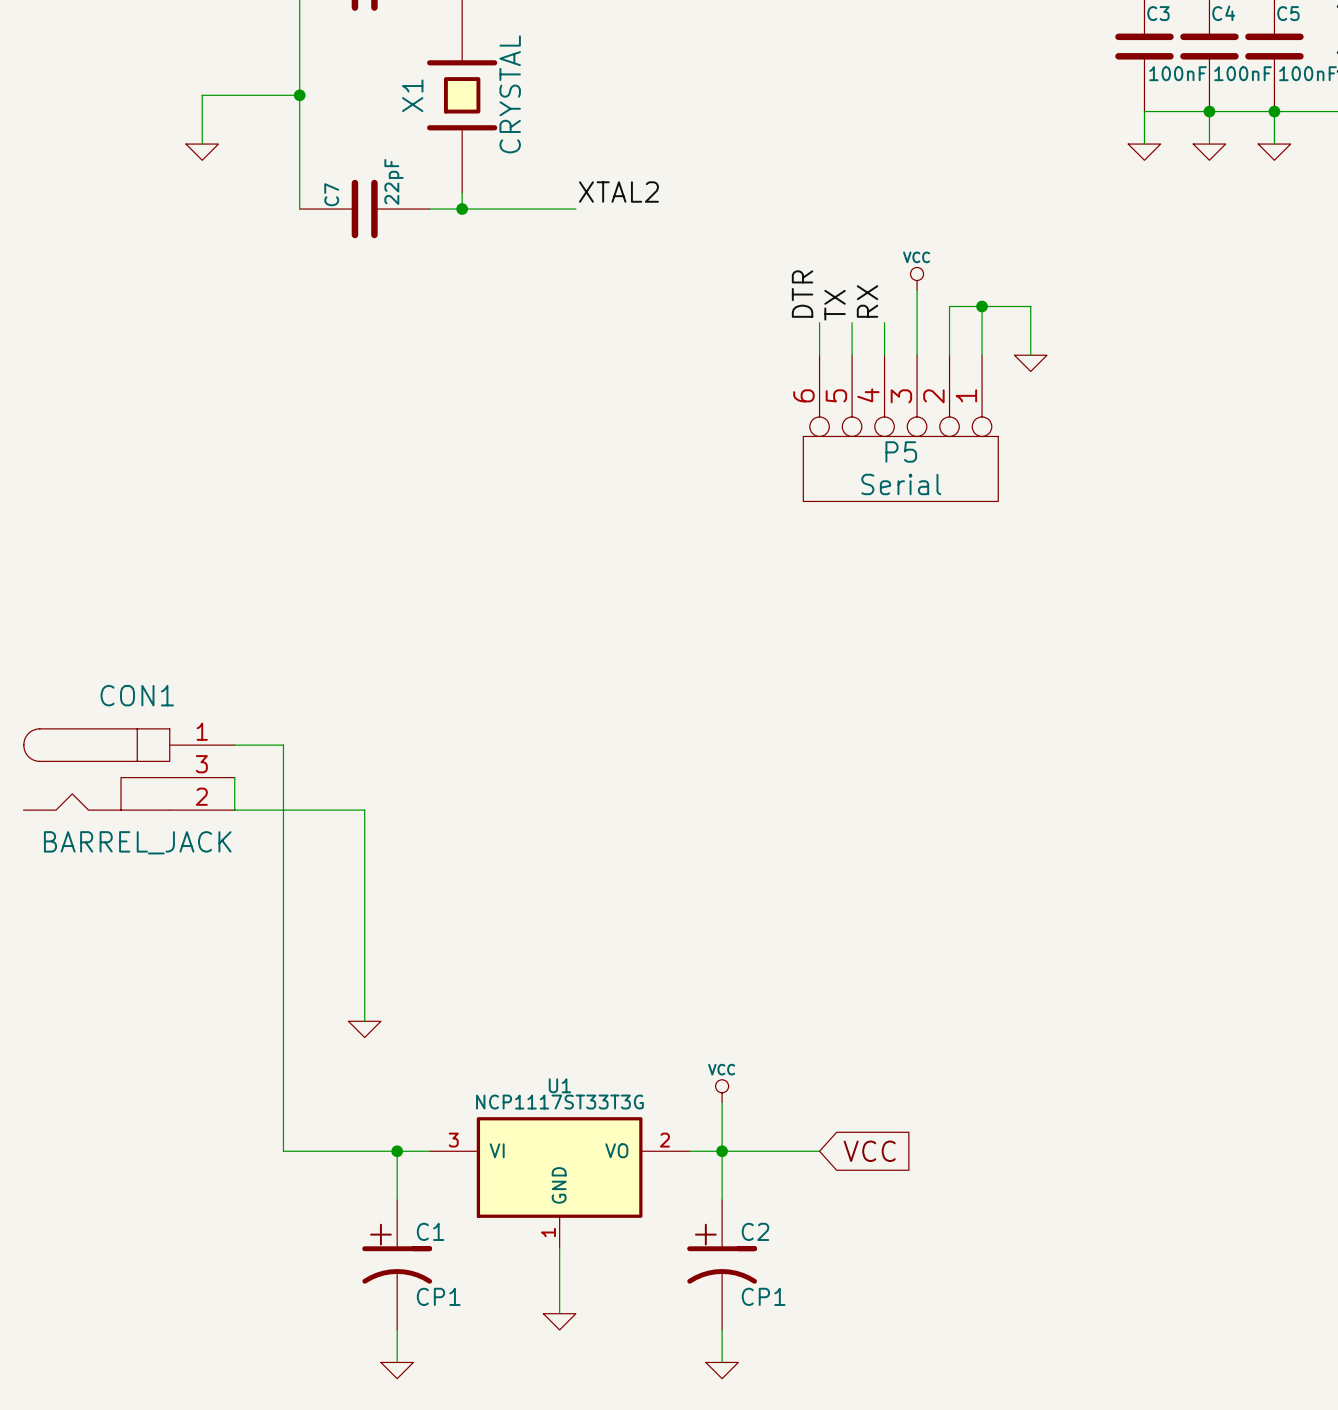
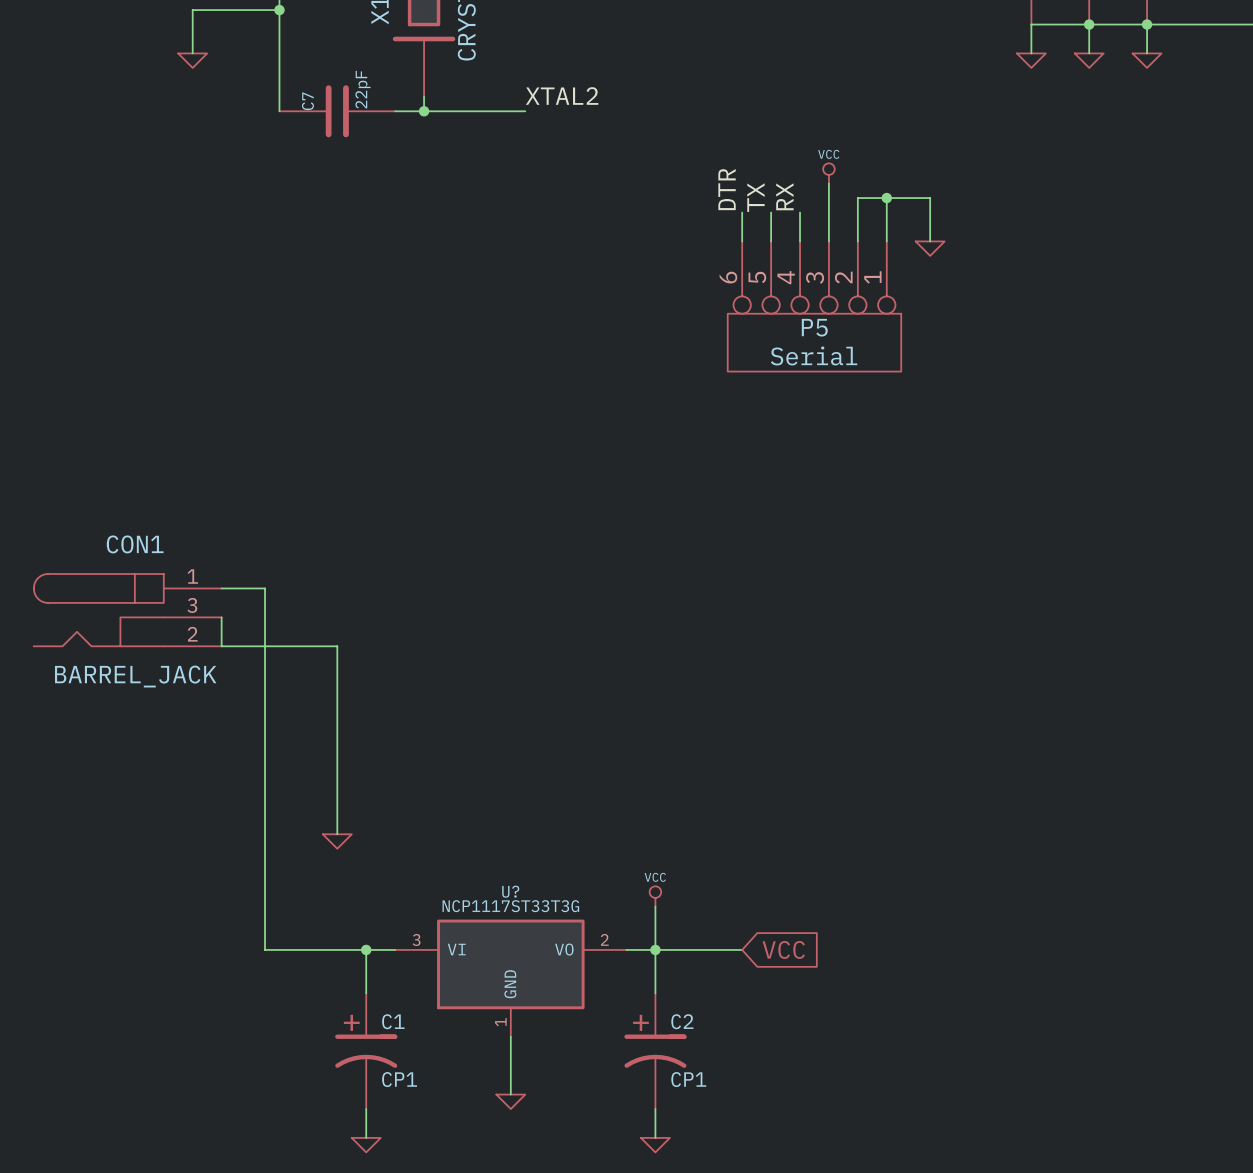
U1 name: U1 (559, 1085) -> U? (510, 891)

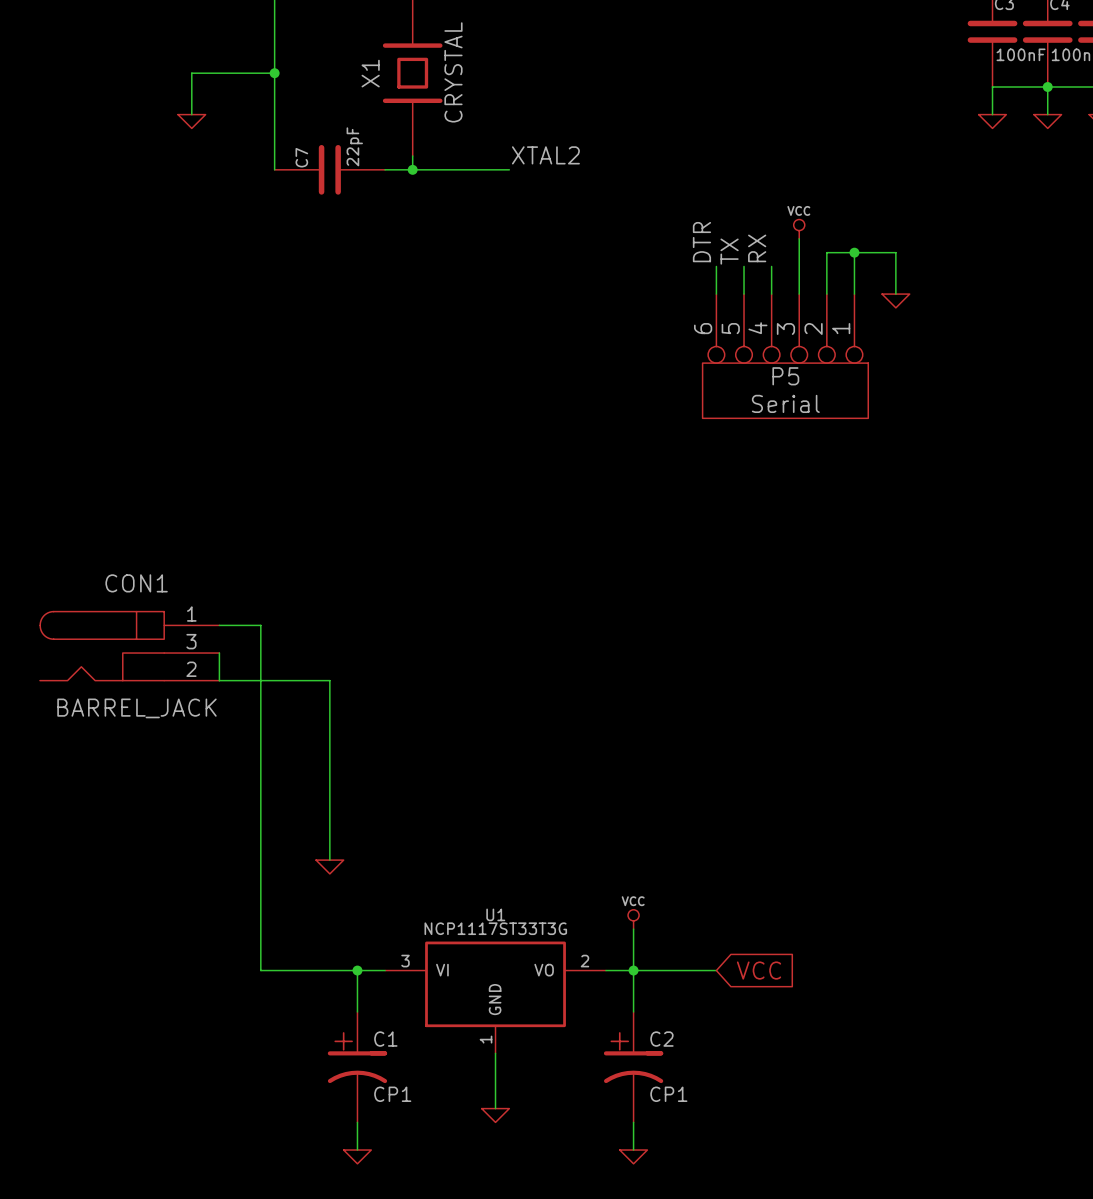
U? name: U? (510, 891) -> U1 (495, 914)

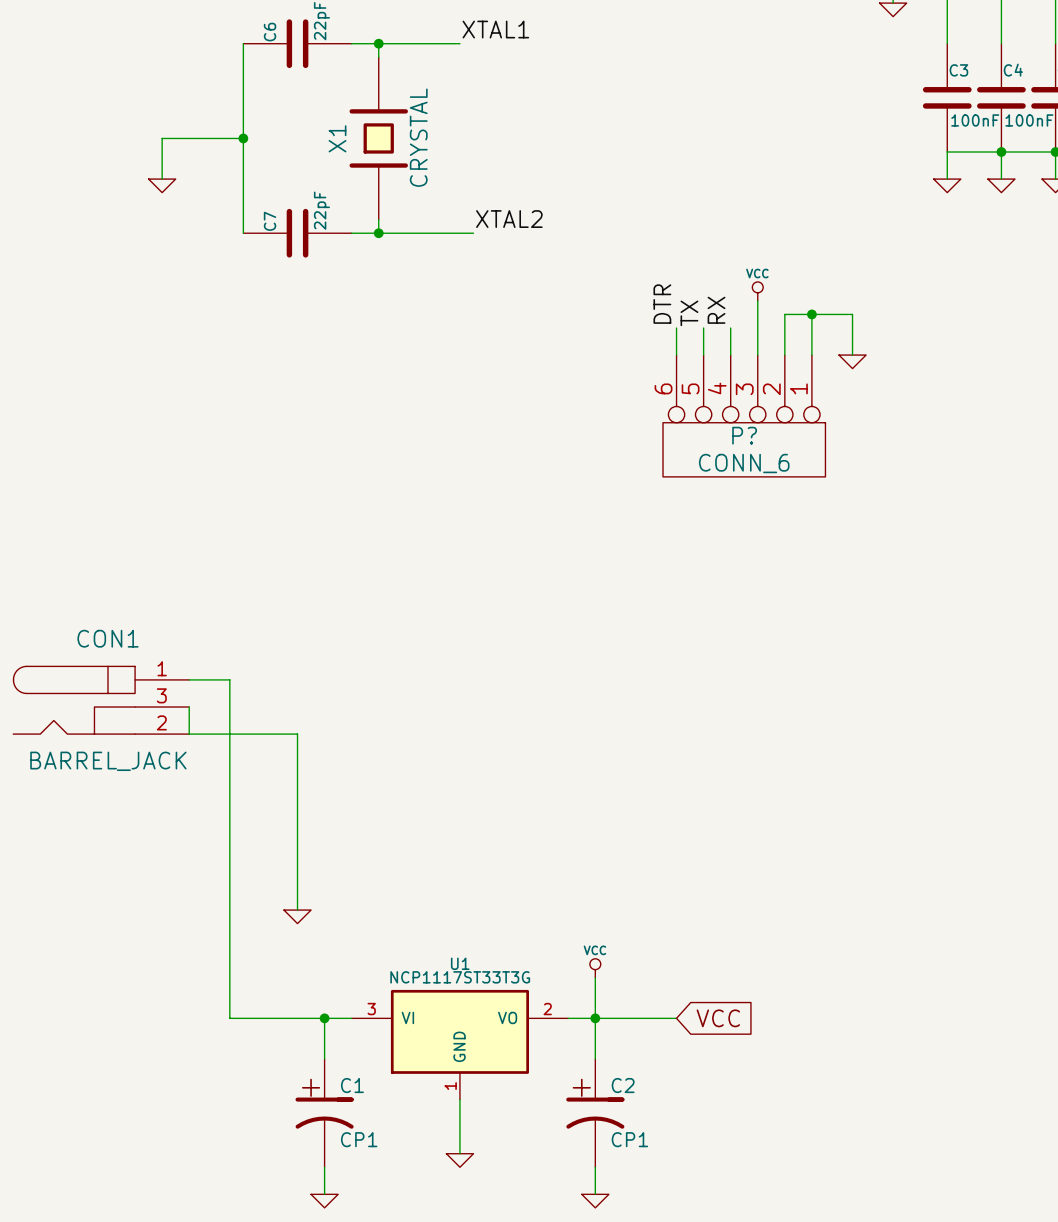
P5 name: P5 (785, 376) -> P? (744, 435)
P5 value: Serial (785, 403) -> CONN_6 (744, 463)

